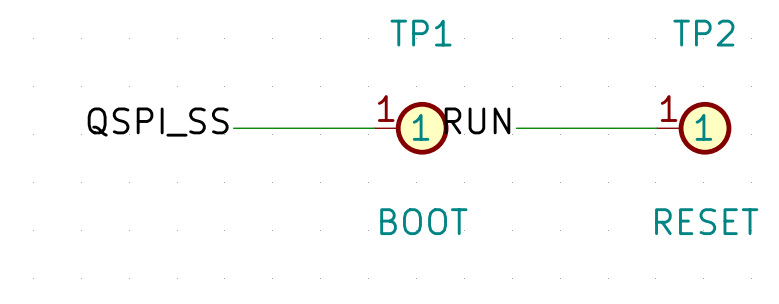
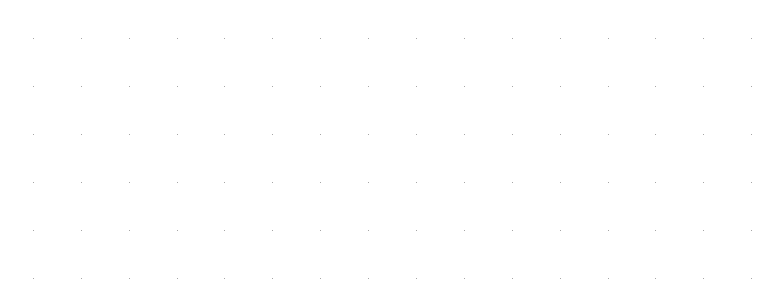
label: RUN (477, 120) -> none
label: QSPI_SS (158, 122) -> none
wire: (233, 128) (374, 128) -> none
TP1: BOOT (411, 128) -> none
wire: (516, 128) (657, 128) -> none
TP2: RESET (694, 128) -> none

